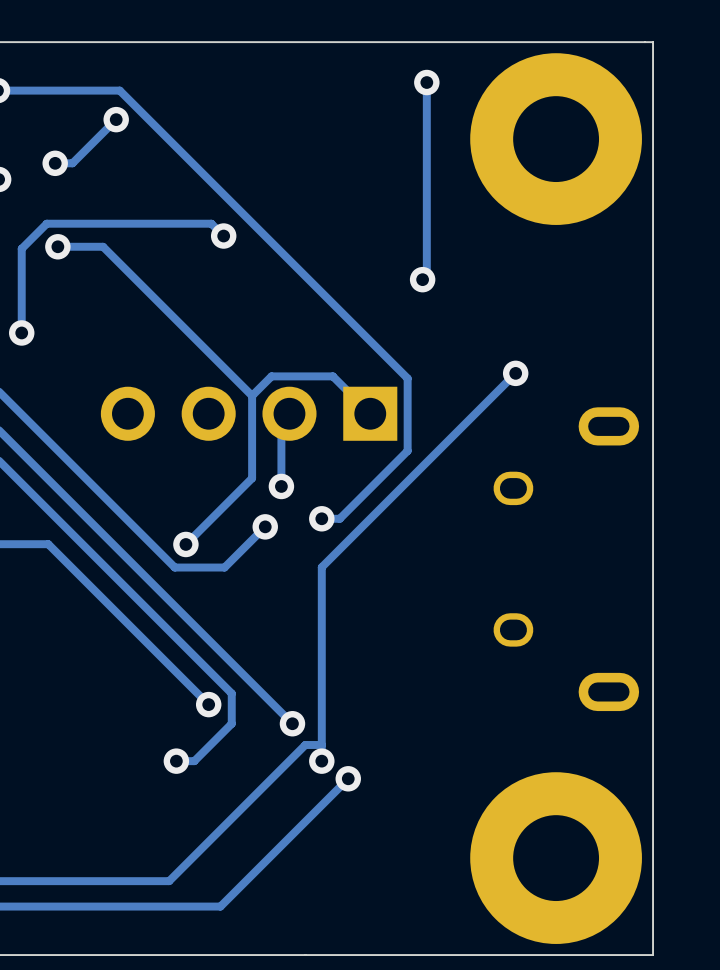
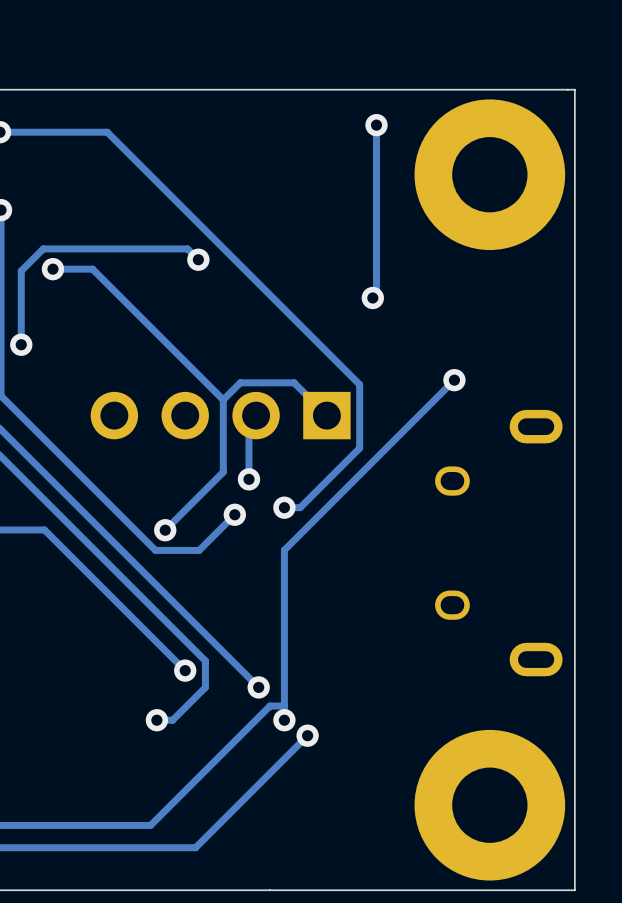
track: (116, 119) (72, 163) (55, 163) -> none
via: (116, 119) -> none
via: (55, 163) -> none

